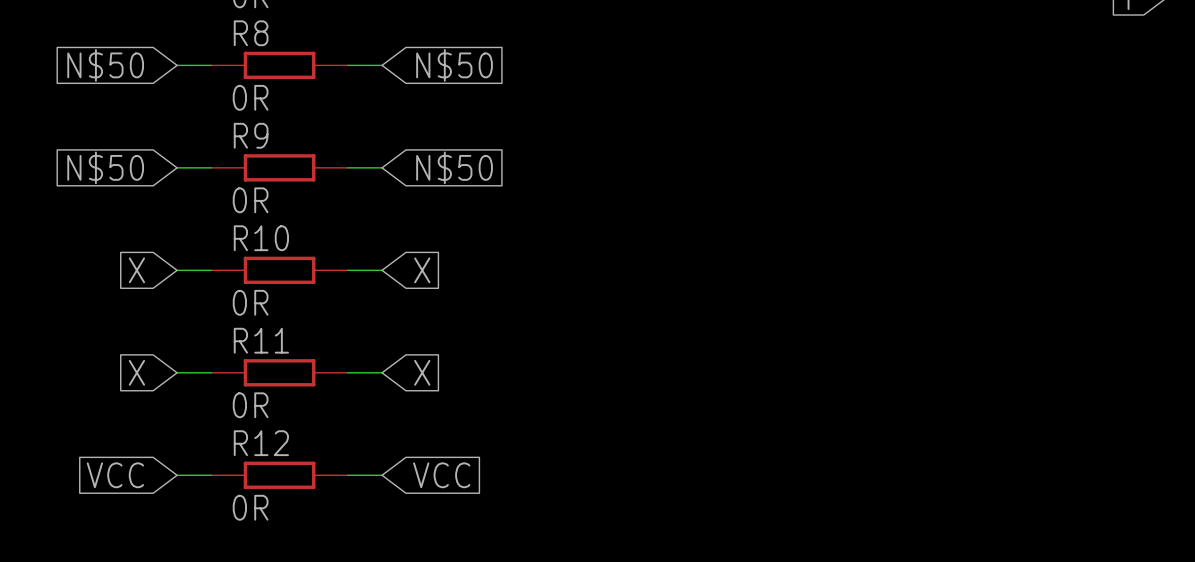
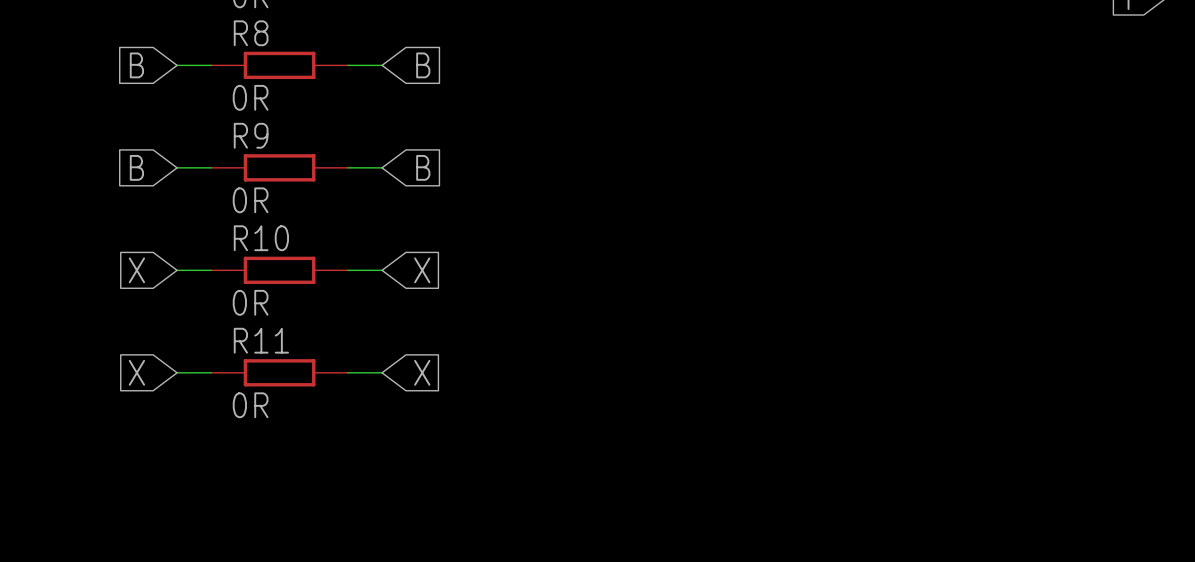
global label: N$50 (105, 65) -> B (136, 65)
global label: N$50 (454, 65) -> B (423, 65)
global label: N$50 (105, 167) -> B (136, 167)
global label: N$50 (454, 167) -> B (423, 167)
global label: VCC (115, 475) -> none
wire: (177, 475) (211, 475) -> none
R12: 0R (279, 475) -> none
wire: (347, 475) (382, 475) -> none
global label: VCC (441, 475) -> none

